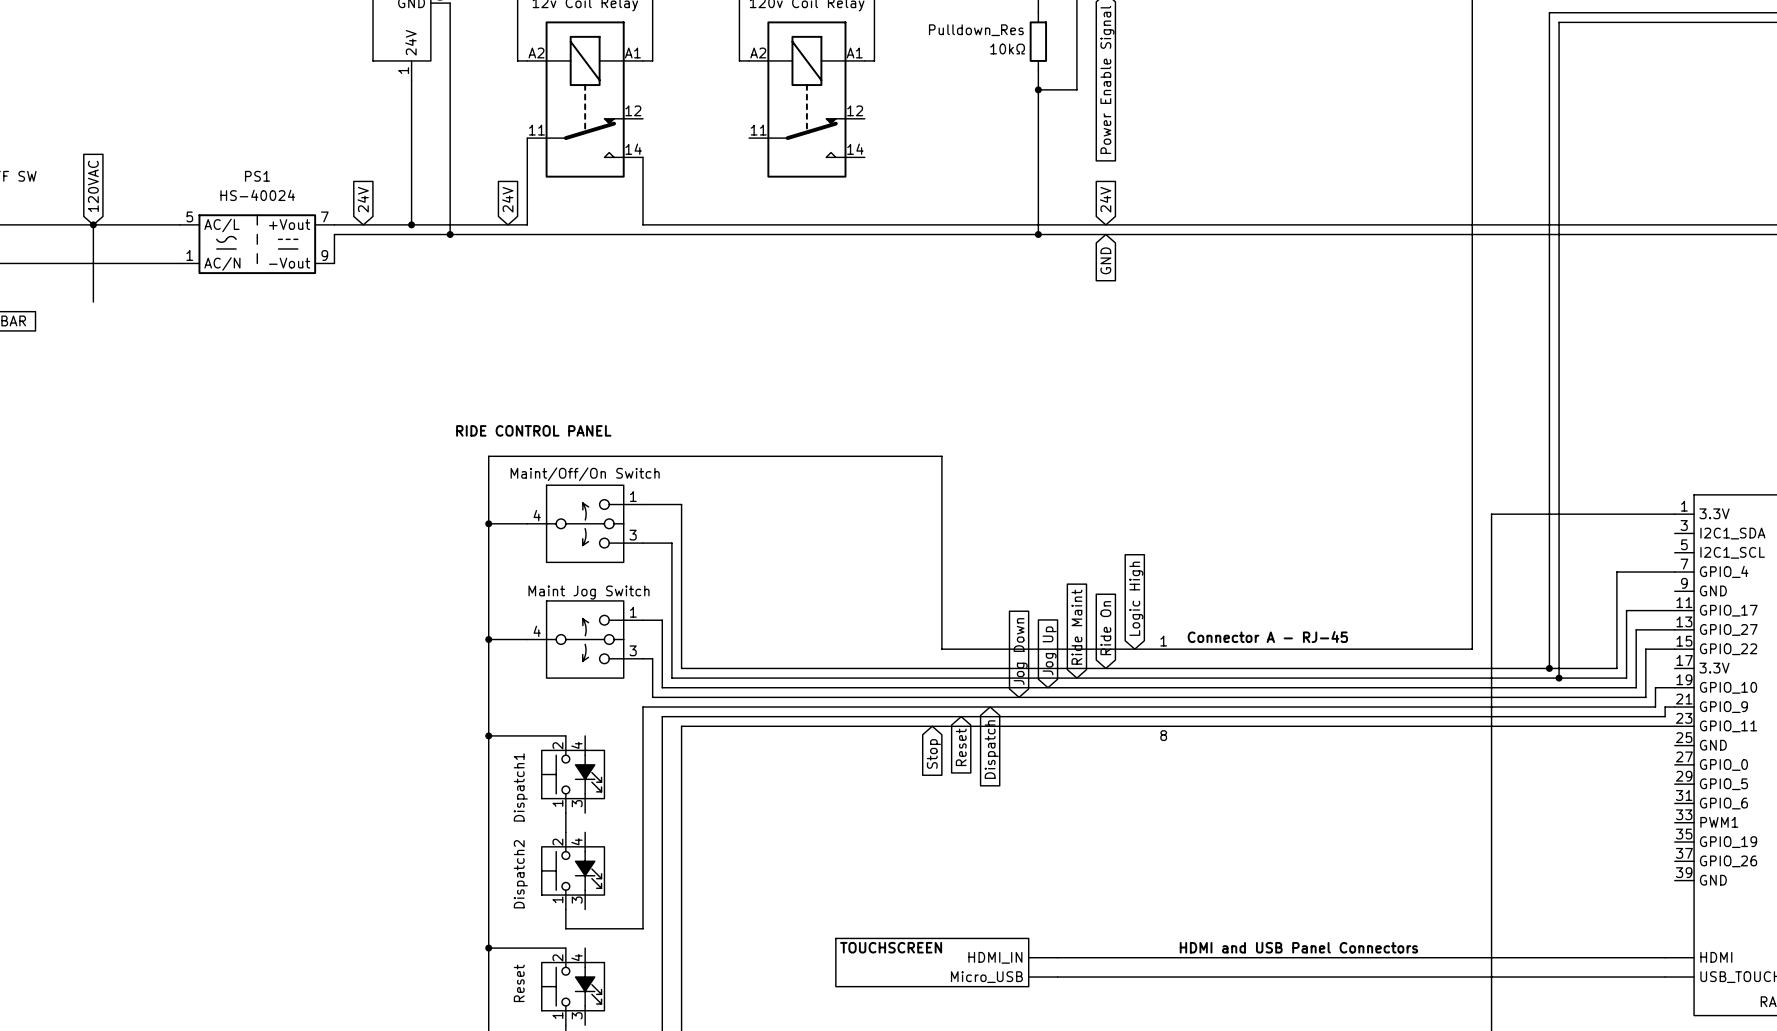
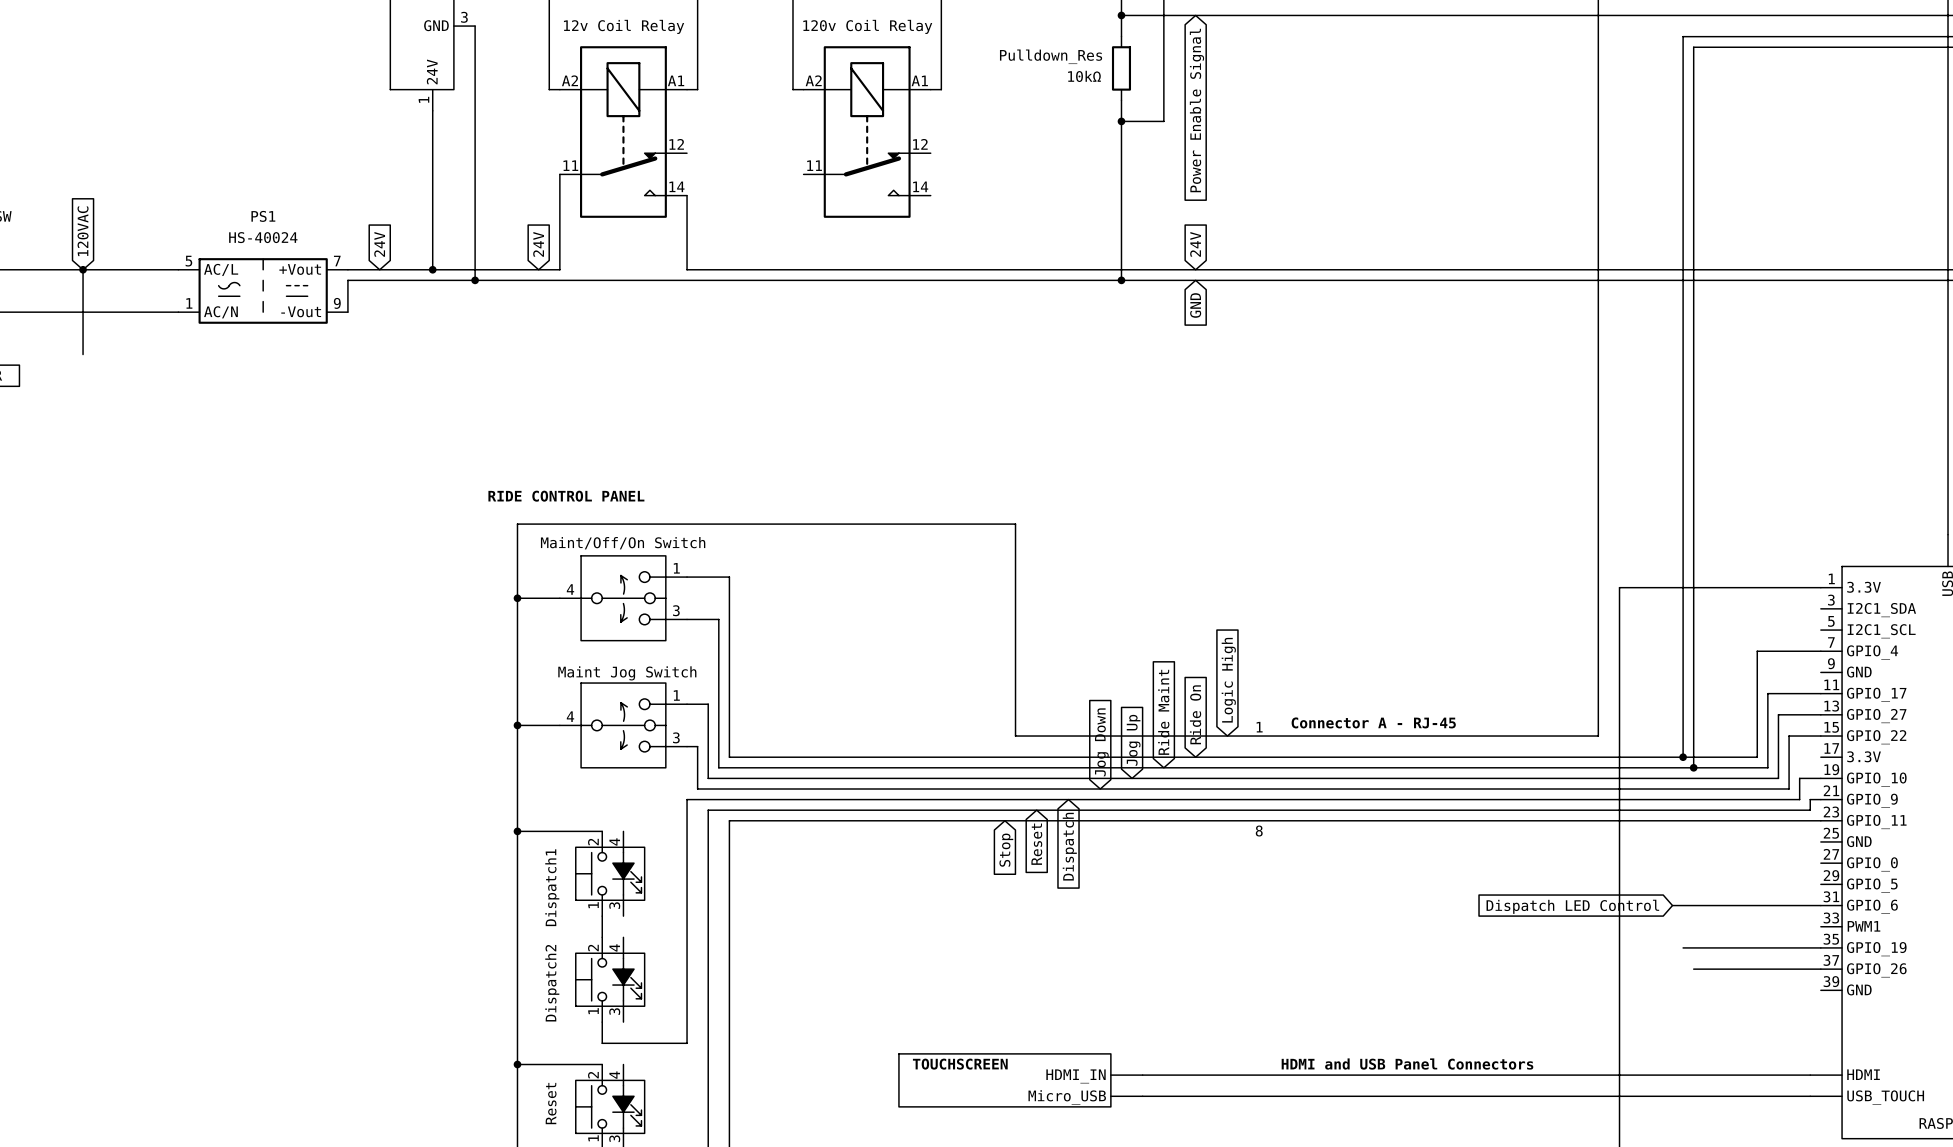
wire: none -> (1672, 905) (1820, 905)
global label: none -> Dispatch LED Control (1572, 906)
wire: none -> (1683, 947) (1820, 947)
wire: none -> (1693, 969) (1820, 969)

